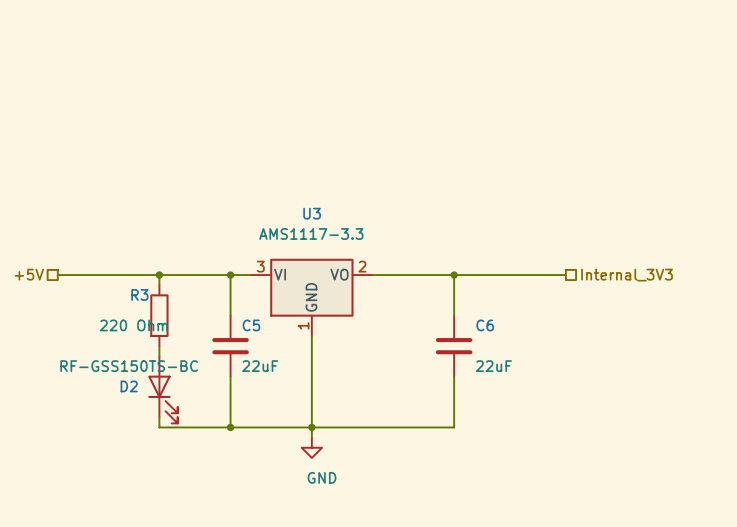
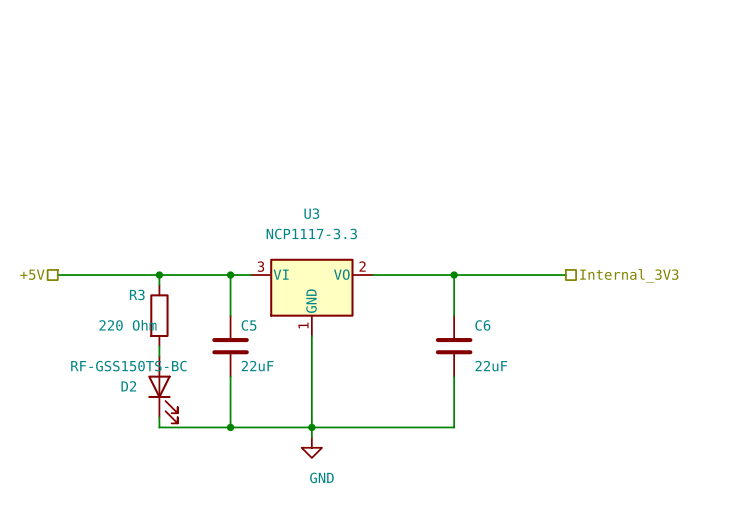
U3 value: AMS1117-3.3 (311, 233) -> NCP1117-3.3 (311, 234)

